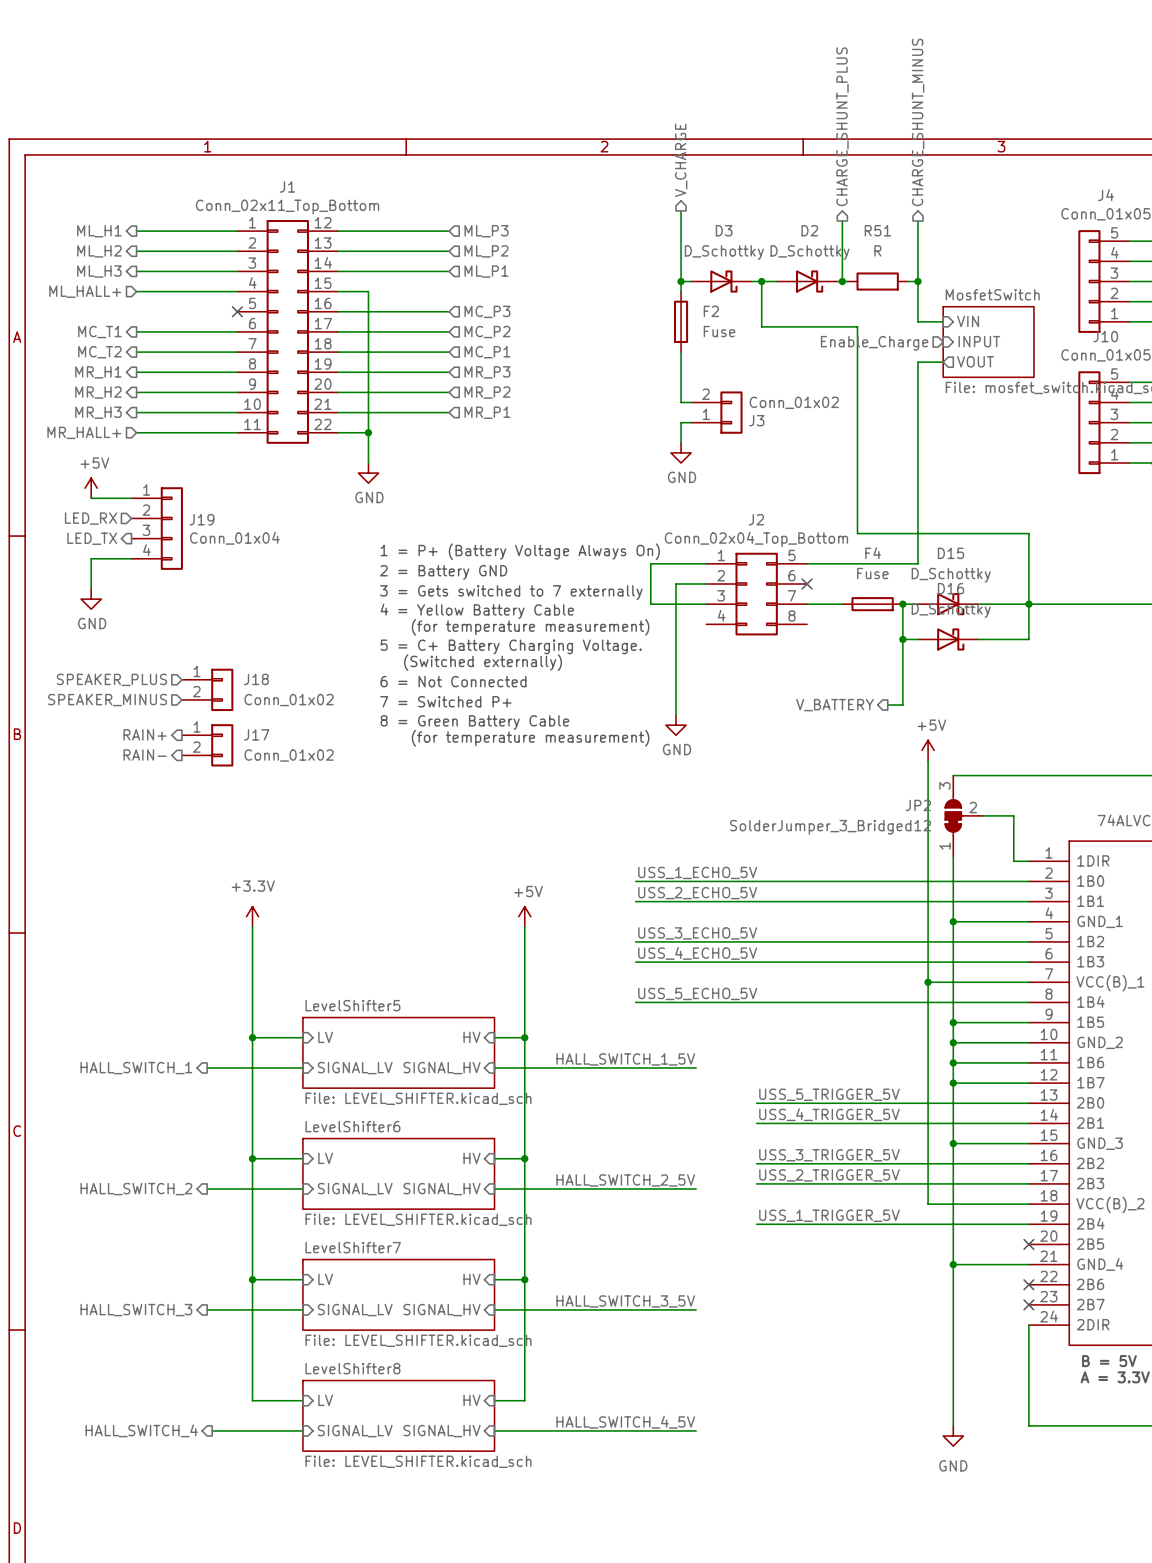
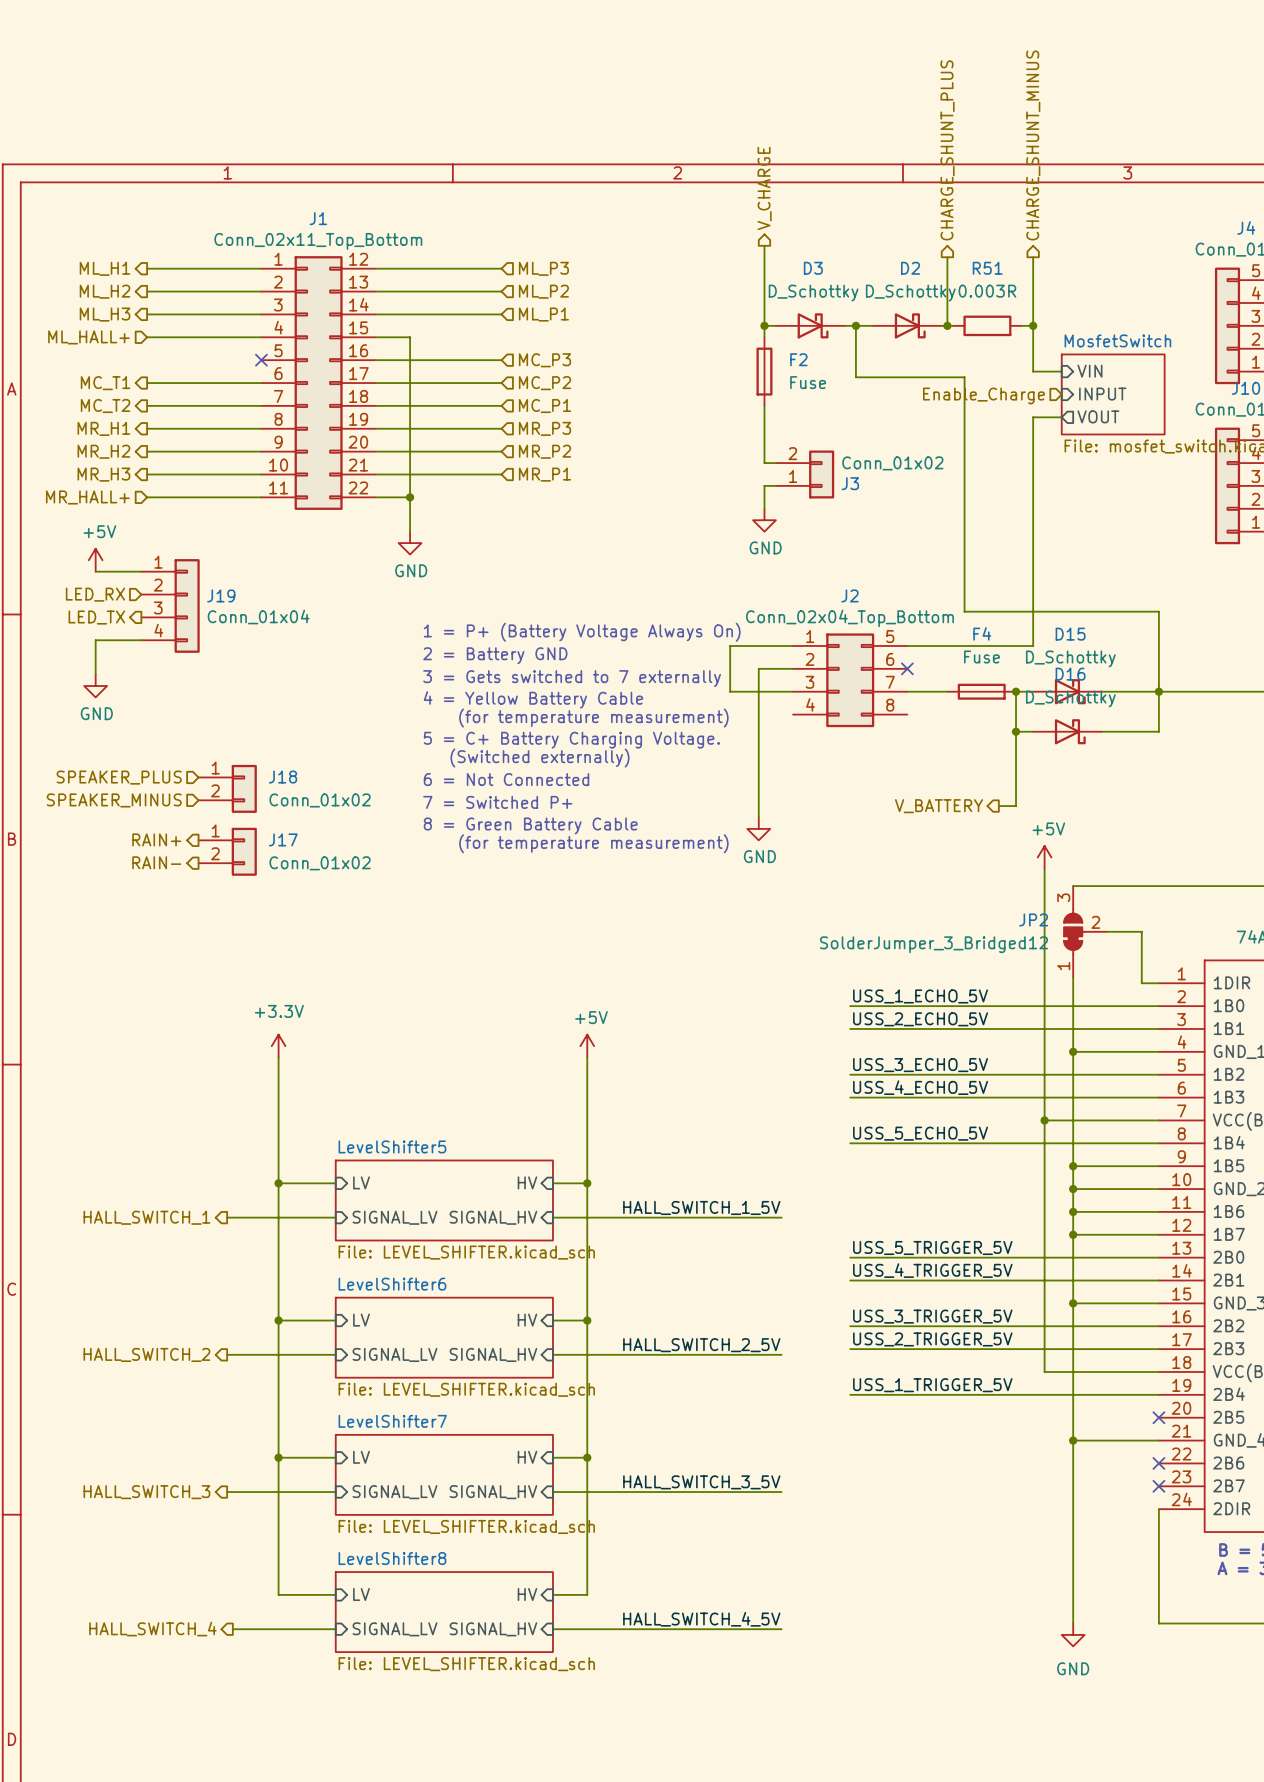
R51 value: R (877, 250) -> 0.003R (987, 291)
label position: USS_1_ECHO_5V (697, 872) -> USS_1_ECHO_5V (920, 996)
wire: (635, 881) (756, 881) -> none
label position: USS_2_ECHO_5V (697, 893) -> USS_2_ECHO_5V (920, 1019)
wire: (635, 901) (756, 901) -> none
label position: USS_3_ECHO_5V (697, 933) -> USS_3_ECHO_5V (920, 1065)
wire: (635, 941) (756, 941) -> none
label position: USS_4_ECHO_5V (697, 953) -> USS_4_ECHO_5V (920, 1087)
wire: (635, 962) (756, 962) -> none
label position: USS_5_ECHO_5V (697, 993) -> USS_5_ECHO_5V (920, 1133)
wire: (635, 1002) (756, 1002) -> none

